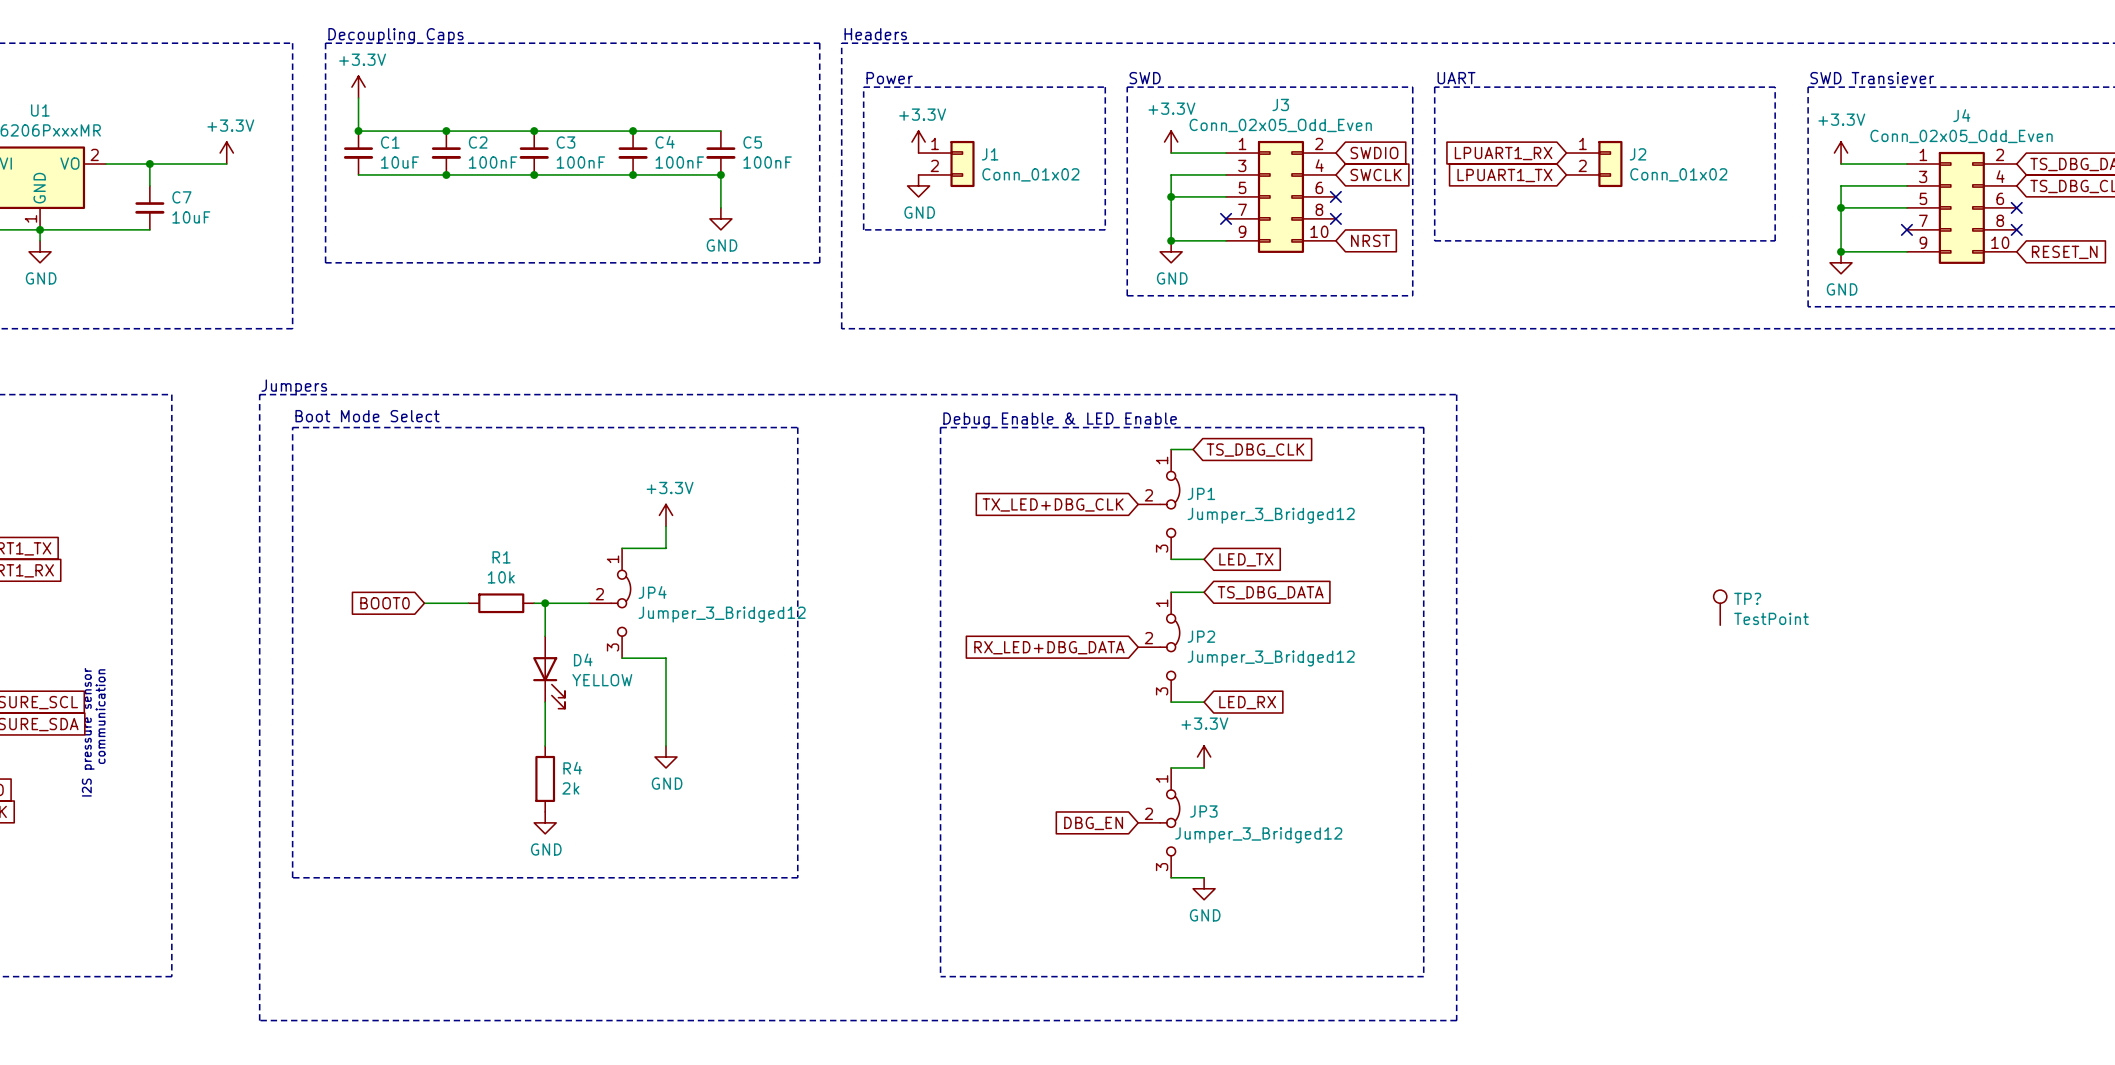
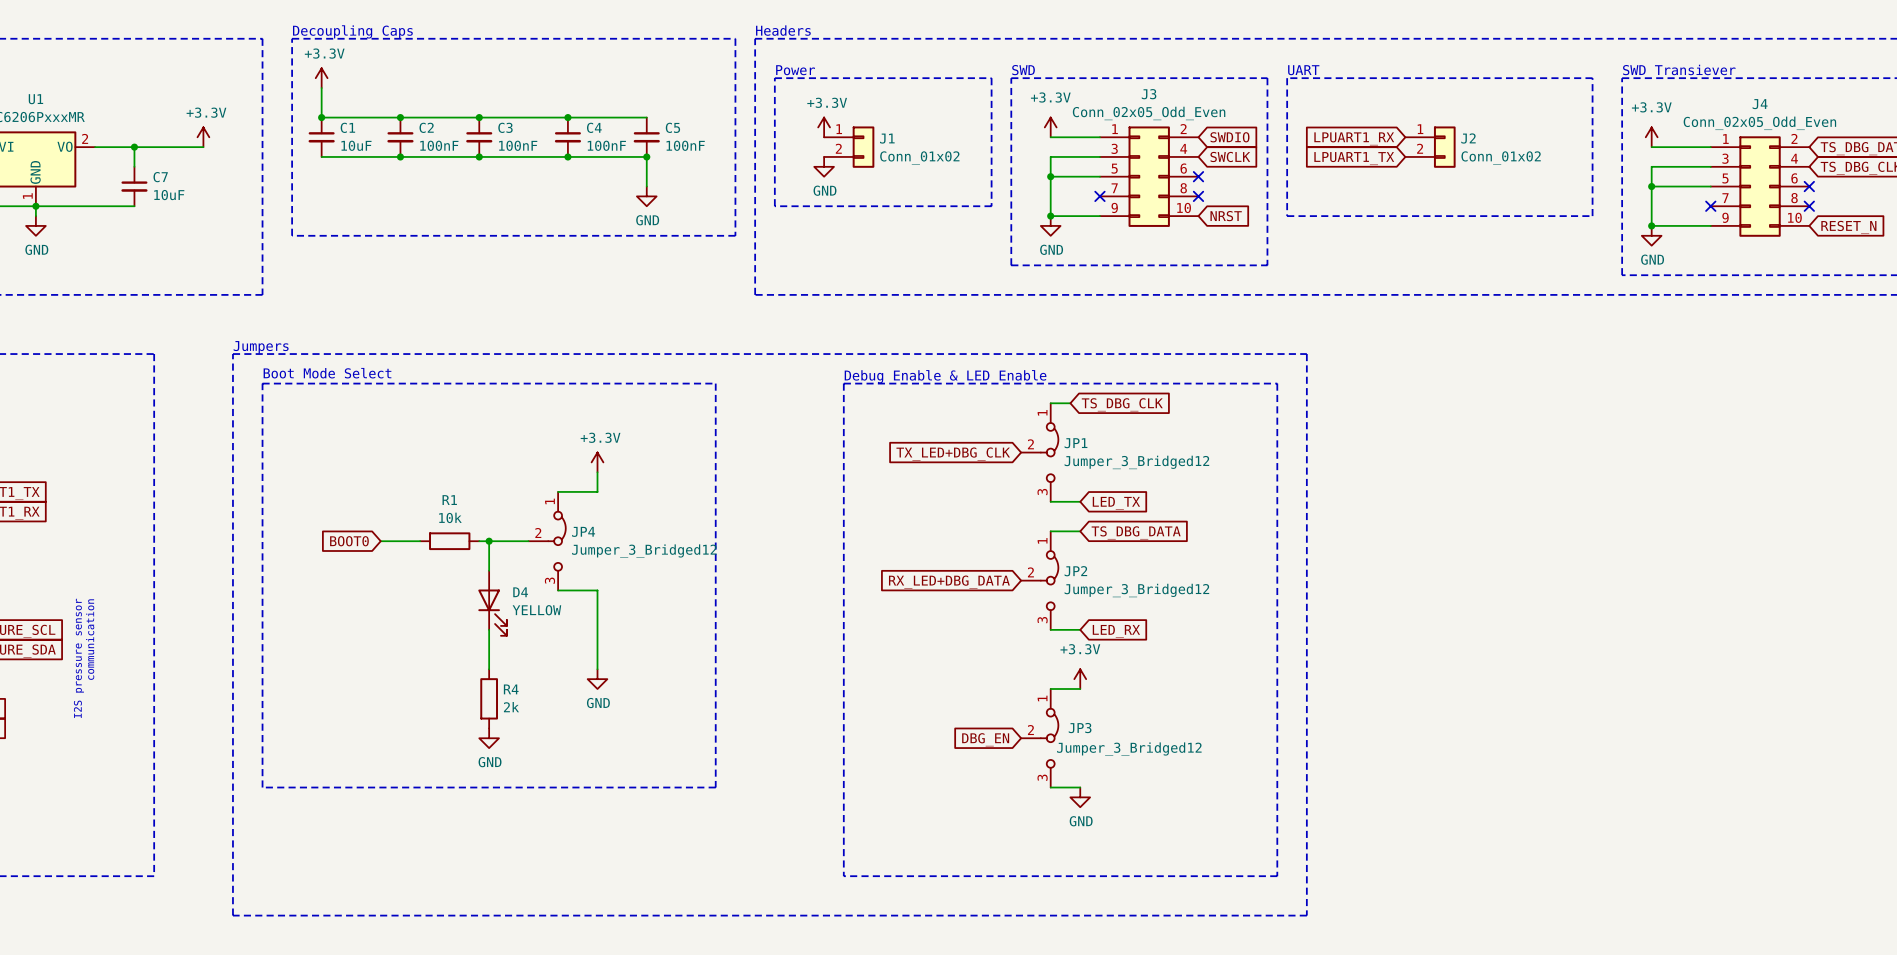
TP?: TestPoint (1720, 607) -> none

